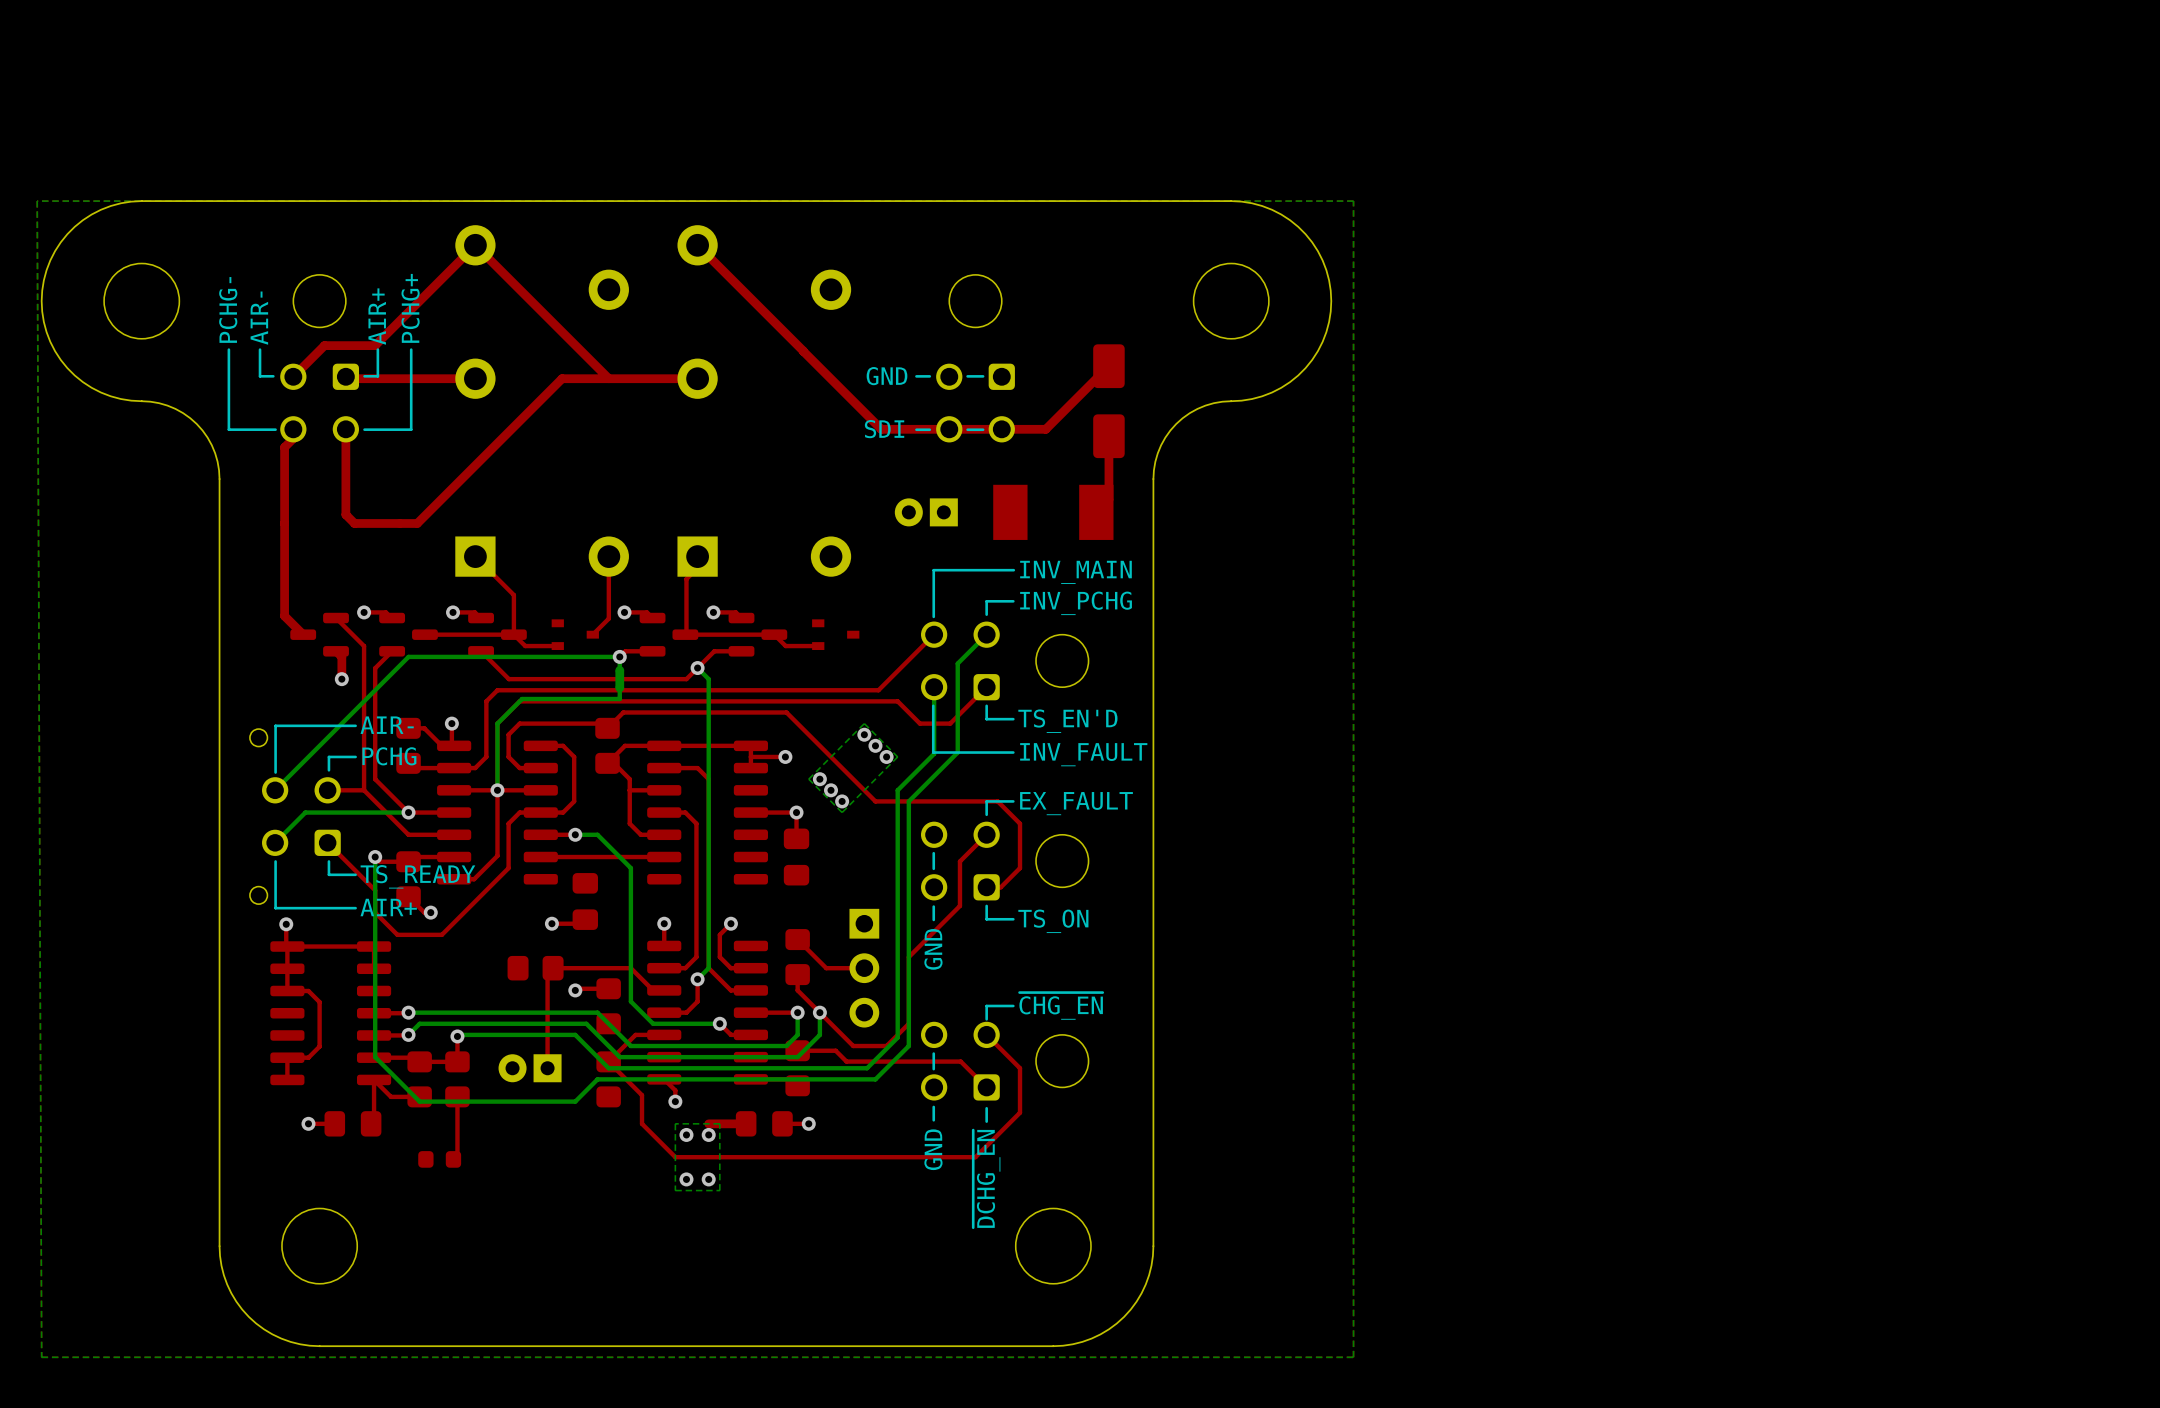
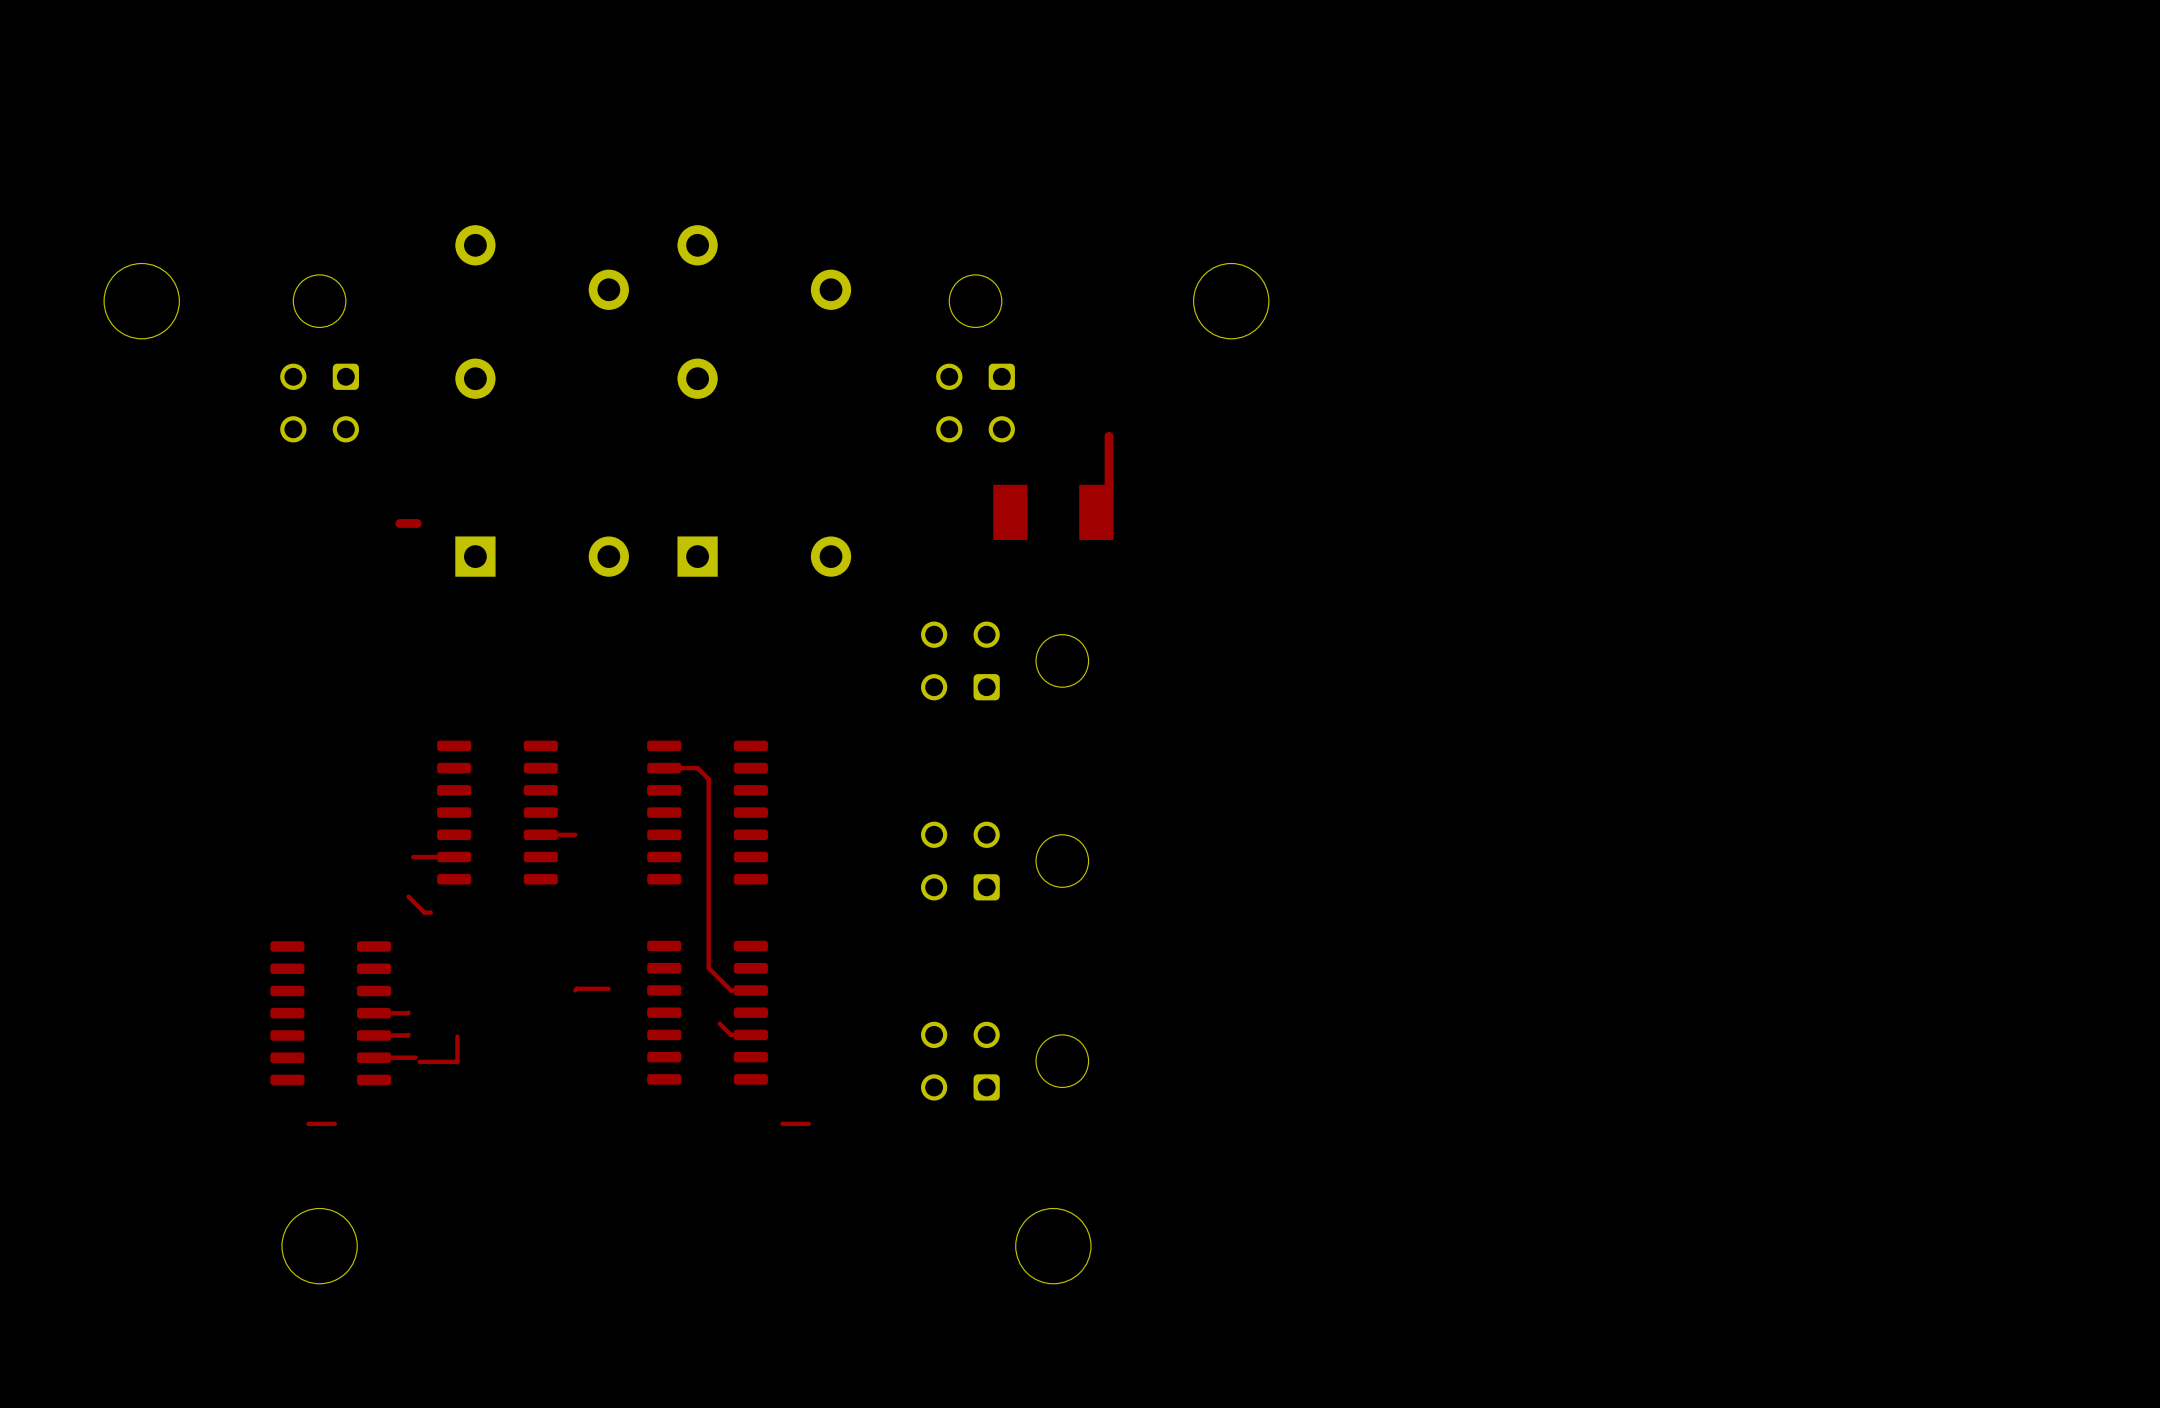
board edge: (1231, 201) (141, 201) (120, 203) (101, 209) (82, 220) (67, 234) (50, 260) (43, 280) (41, 301) (46, 332) (60, 359) (74, 375) (101, 392) (120, 399) (159, 403) (183, 413) (202, 430) (211, 445) (217, 461) (219, 479) (219, 1246) (221, 1265) (227, 1284) (236, 1301) (256, 1323) (272, 1334) (290, 1341) (319, 1346) (1053, 1346) (1082, 1341) (1100, 1334) (1116, 1323) (1130, 1309) (1141, 1293) (1149, 1275) (1153, 1246) (1153, 479) (1155, 461) (1165, 437) (1176, 424) (1189, 413) (1213, 403) (1262, 396) (1281, 387) (1298, 375) (1317, 351) (1326, 332) (1330, 311) (1330, 290) (1326, 270) (1317, 251) (1305, 234) (1290, 220) (1271, 209) (1252, 203) (1231, 201) -> none
bottom zone outline: (1353, 201) (37, 201) (41, 1357) (1353, 1357) (1353, 201) -> none
top track: (697, 245) (803, 351) -> none
text: PCHG+ (410, 308) -> none
text: PCHG- (228, 309) -> none
text: AIR+ (377, 316) -> none
text: AIR- (259, 318) -> none
top track: (375, 345) (475, 245) (608, 378) -> none
top track: (375, 345) (324, 345) (293, 376) -> none
line: (228, 349) (228, 429) (275, 429) -> none
line: (260, 349) (260, 376) (273, 376) -> none
line: (377, 349) (377, 376) (364, 376) -> none
line: (411, 349) (411, 429) (364, 429) -> none
top track: (803, 351) (881, 429) (1045, 429) (1108, 366) -> none
text: GND (887, 376) -> none
line: (929, 376) (916, 376) -> none
line: (983, 376) (967, 376) -> none
top track: (475, 378) (347, 378) -> none
top track: (697, 378) (562, 378) (417, 523) -> none
part: (1108, 401) -> none
top track: (293, 429) (293, 438) (284, 447) (284, 616) (303, 634) -> none
top track: (345, 429) (345, 514) (354, 523) (399, 523) -> none
text: SDI (884, 429) -> none
line: (929, 429) (916, 429) -> none
line: (983, 429) (967, 429) -> none
part: (926, 512) -> none
top track: (475, 556) (513, 595) (513, 634) -> none
top track: (608, 556) (608, 618) (592, 634) -> none
top track: (697, 567) (686, 579) (686, 633) -> none
line: (1013, 570) (933, 570) (933, 616) -> none
text: INV_MAIN (1075, 572) -> none
line: (1013, 601) (986, 601) (986, 614) -> none
text: INV_PCHG (1076, 603) -> none
top track: (364, 612) (385, 612) (391, 618) -> none
via: (364, 612) -> none
top track: (453, 612) (474, 612) (480, 618) -> none
via: (453, 612) -> none
top track: (624, 612) (646, 612) (652, 618) -> none
via: (624, 612) -> none
top track: (713, 612) (735, 612) (741, 618) -> none
via: (713, 612) -> none
top track: (336, 618) (364, 646) (364, 790) -> none
part: (319, 634) -> none
part: (408, 634) -> none
part: (497, 634) -> none
top track: (513, 634) (424, 634) -> none
top track: (513, 634) (525, 646) (557, 646) -> none
part: (575, 634) -> none
part: (668, 634) -> none
top track: (685, 634) (774, 634) (785, 646) (818, 646) -> none
part: (757, 634) -> none
part: (835, 634) -> none
top track: (934, 634) (878, 690) (497, 690) (486, 701) (486, 756) (475, 768) (413, 768) -> none
bottom track: (986, 634) (957, 663) (957, 752) (908, 801) (908, 1046) (875, 1079) (597, 1079) (575, 1101) (419, 1101) (375, 1057) (375, 857) -> none
top track: (336, 651) (341, 656) (341, 679) -> none
top track: (392, 651) (375, 668) (375, 779) (408, 812) (454, 812) -> none
top track: (652, 651) (625, 651) (619, 656) -> none
top track: (741, 651) (714, 651) (686, 679) (508, 679) (481, 651) -> none
via: (619, 656) -> none
bottom track: (697, 668) (708, 679) (708, 968) (697, 979) -> none
via: (697, 668) -> none
bottom track: (619, 670) (619, 656) (408, 656) (275, 790) -> none
via: (341, 679) -> none
part: (619, 679) -> none
bottom track: (619, 687) (619, 699) (522, 699) (497, 723) (497, 790) -> none
bottom track: (934, 687) (934, 753) (897, 790) (897, 1037) (867, 1068) (608, 1068) (575, 1034) (459, 1034) (457, 1036) -> none
top track: (986, 687) (950, 723) (919, 723) (897, 701) (519, 701) (497, 723) (497, 855) (474, 879) (454, 879) -> none
line: (933, 705) (933, 752) (1013, 752) -> none
line: (986, 705) (986, 719) (1013, 719) -> none
text: TS_EN'D (1067, 721) -> none
top track: (451, 723) (451, 743) -> none
via: (451, 723) -> none
top track: (602, 723) (519, 723) (508, 734) (508, 756) (519, 768) (540, 768) -> none
bottom zone outline: (864, 723) (808, 779) (842, 812) (897, 756) (864, 723) -> none
line: (355, 725) (275, 725) (275, 772) -> none
text: AIR- (387, 725) -> none
top track: (408, 728) (424, 728) (441, 745) -> none
top track: (607, 728) (623, 712) (786, 712) (875, 801) (997, 801) (1020, 823) (1020, 868) (1000, 887) (986, 887) -> none
via: (864, 734) -> none
part: (408, 745) -> none
top track: (540, 745) (563, 745) (574, 756) (574, 801) (563, 812) (519, 812) (508, 823) (508, 868) (441, 934) (397, 934) (375, 912) (375, 890) (327, 842) -> none
part: (607, 745) -> none
via: (875, 745) -> none
text: INV_FAULT (1083, 754) -> none
line: (355, 756) (328, 756) (328, 770) -> none
text: PCHG (389, 756) -> none
top track: (785, 756) (750, 756) -> none
via: (785, 756) -> none
via: (886, 756) -> none
top track: (607, 763) (625, 745) (750, 745) (750, 768) -> none
top track: (613, 763) (629, 779) (629, 823) (640, 834) (664, 834) -> none
via: (819, 779) -> none
top track: (364, 790) (327, 790) -> none
top track: (364, 790) (408, 834) (454, 834) -> none
via: (497, 790) -> none
top track: (540, 790) (454, 790) -> none
top track: (664, 790) (629, 790) -> none
via: (831, 790) -> none
via: (842, 801) -> none
line: (1013, 801) (986, 801) (986, 814) -> none
text: EX_FAULT (1076, 803) -> none
bottom track: (408, 812) (305, 812) (275, 842) -> none
via: (408, 812) -> none
top track: (664, 812) (685, 812) (696, 823) (696, 957) (685, 968) (664, 968) -> none
top track: (750, 812) (796, 812) (796, 838) -> none
via: (796, 812) -> none
part: (295, 816) -> none
bottom track: (575, 834) (597, 834) (630, 868) (630, 1001) (653, 1023) (719, 1023) -> none
via: (575, 834) -> none
top track: (986, 834) (959, 861) (959, 905) (908, 957) (908, 1023) (886, 1046) (853, 1046) (797, 990) (797, 974) -> none
line: (933, 853) (933, 868) -> none
top track: (375, 857) (379, 861) (408, 861) -> none
via: (375, 857) -> none
top track: (664, 857) (540, 857) -> none
part: (796, 857) -> none
line: (275, 861) (275, 908) (355, 908) -> none
line: (328, 861) (328, 874) (355, 874) -> none
text: TS_READY (417, 876) -> none
part: (408, 879) -> none
part: (585, 901) -> none
line: (986, 905) (986, 919) (1013, 919) -> none
line: (933, 906) (933, 919) -> none
text: AIR+ (388, 907) -> none
via: (430, 912) -> none
text: TS_ON (1053, 921) -> none
via: (551, 923) -> none
top track: (581, 923) (551, 923) -> none
top track: (664, 923) (664, 945) -> none
via: (664, 923) -> none
top track: (730, 923) (719, 934) (719, 957) (730, 968) (750, 968) -> none
via: (730, 923) -> none
top track: (286, 924) (286, 945) -> none
via: (286, 924) -> none
top track: (797, 939) (826, 968) (864, 968) -> none
text: GND (933, 949) -> none
part: (797, 957) -> none
top track: (374, 968) (374, 946) (287, 946) (287, 991) (308, 991) (319, 1002) (319, 1046) (308, 1057) (287, 1057) (287, 1079) -> none
part: (535, 968) -> none
top track: (553, 968) (630, 968) (653, 990) -> none
part: (864, 968) -> none
top track: (547, 973) (547, 1068) -> none
top track: (697, 979) (697, 1001) (686, 1012) (664, 1012) -> none
via: (697, 979) -> none
via: (575, 990) -> none
line: (1013, 1005) (986, 1005) (986, 1019) -> none
part: (608, 1006) -> none
text: ~{CHG_EN} (1061, 1006) -> none
via: (408, 1012) -> none
top track: (797, 1012) (750, 1012) -> none
bottom track: (797, 1012) (797, 1034) (786, 1046) (630, 1046) (597, 1012) (408, 1012) -> none
via: (797, 1012) -> none
bottom track: (819, 1012) (819, 1034) (797, 1057) (619, 1057) (586, 1023) (419, 1023) (408, 1034) -> none
via: (819, 1012) -> none
via: (719, 1023) -> none
via: (408, 1034) -> none
top track: (986, 1034) (1020, 1068) (1020, 1112) (975, 1157) (675, 1157) (642, 1123) (642, 1095) (608, 1061) (635, 1034) (664, 1034) -> none
via: (457, 1036) -> none
top track: (797, 1050) (835, 1050) (846, 1061) (960, 1061) (986, 1087) -> none
line: (933, 1053) (933, 1069) -> none
part: (530, 1068) -> none
part: (797, 1068) -> none
part: (419, 1079) -> none
part: (457, 1079) -> none
part: (608, 1079) -> none
top track: (664, 1079) (675, 1090) (675, 1101) -> none
top track: (419, 1096) (390, 1096) (374, 1079) (374, 1120) -> none
top track: (457, 1096) (457, 1155) (453, 1159) -> none
via: (675, 1101) -> none
line: (933, 1106) (933, 1120) -> none
line: (986, 1108) (986, 1121) -> none
via: (308, 1123) -> none
part: (352, 1123) -> none
bottom zone outline: (719, 1123) (675, 1123) (675, 1190) (719, 1190) (719, 1123) -> none
top track: (746, 1123) (708, 1123) -> none
part: (764, 1123) -> none
via: (808, 1123) -> none
via: (686, 1134) -> none
via: (708, 1134) -> none
text: GND (933, 1149) -> none
part: (439, 1159) -> none
text: ~{DCHG_EN} (986, 1178) -> none
via: (686, 1179) -> none
via: (708, 1179) -> none

